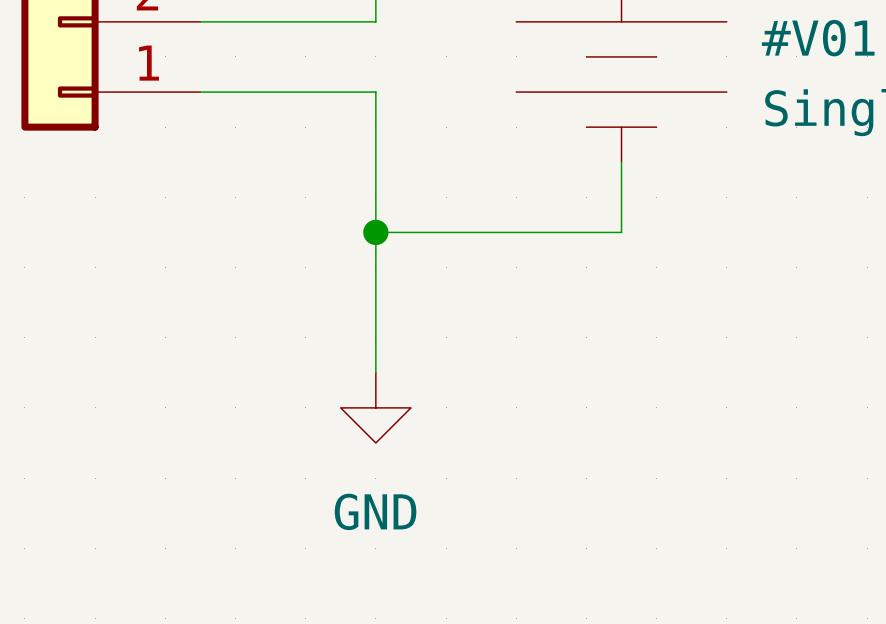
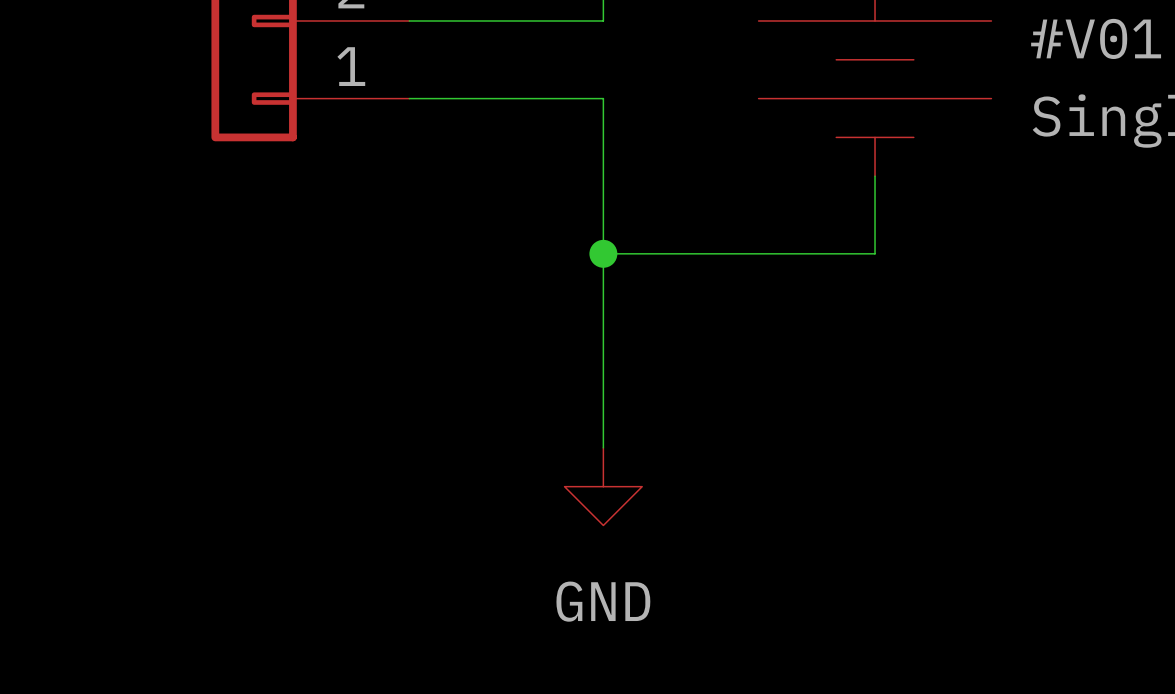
power symbol position: GND (375, 407) -> GND (603, 486)

